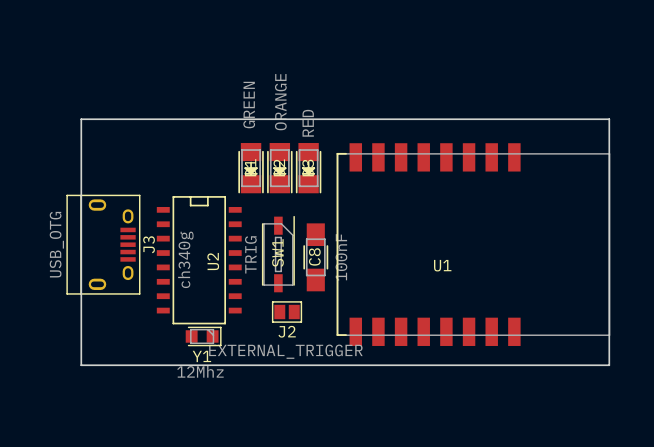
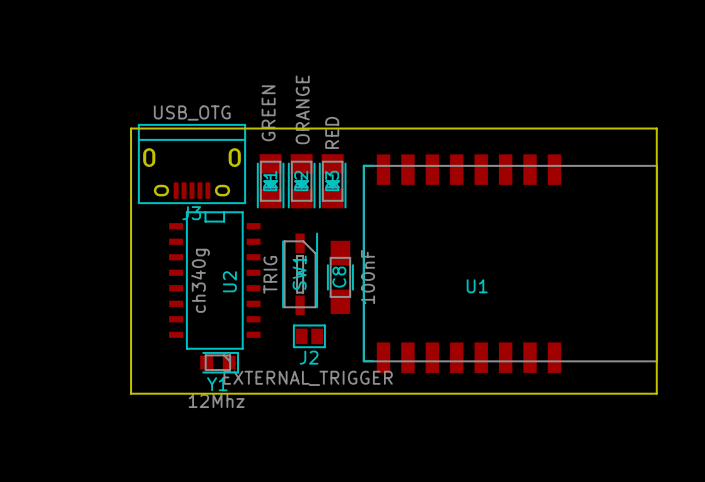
board edge: (121, 119) (81, 119) (81, 365) (121, 365) -> (131, 128) (131, 393)
J3 rotation: 0° (103, 244) -> 90° clockwise (191, 164)
J3 position: (103, 244) -> (191, 164)

